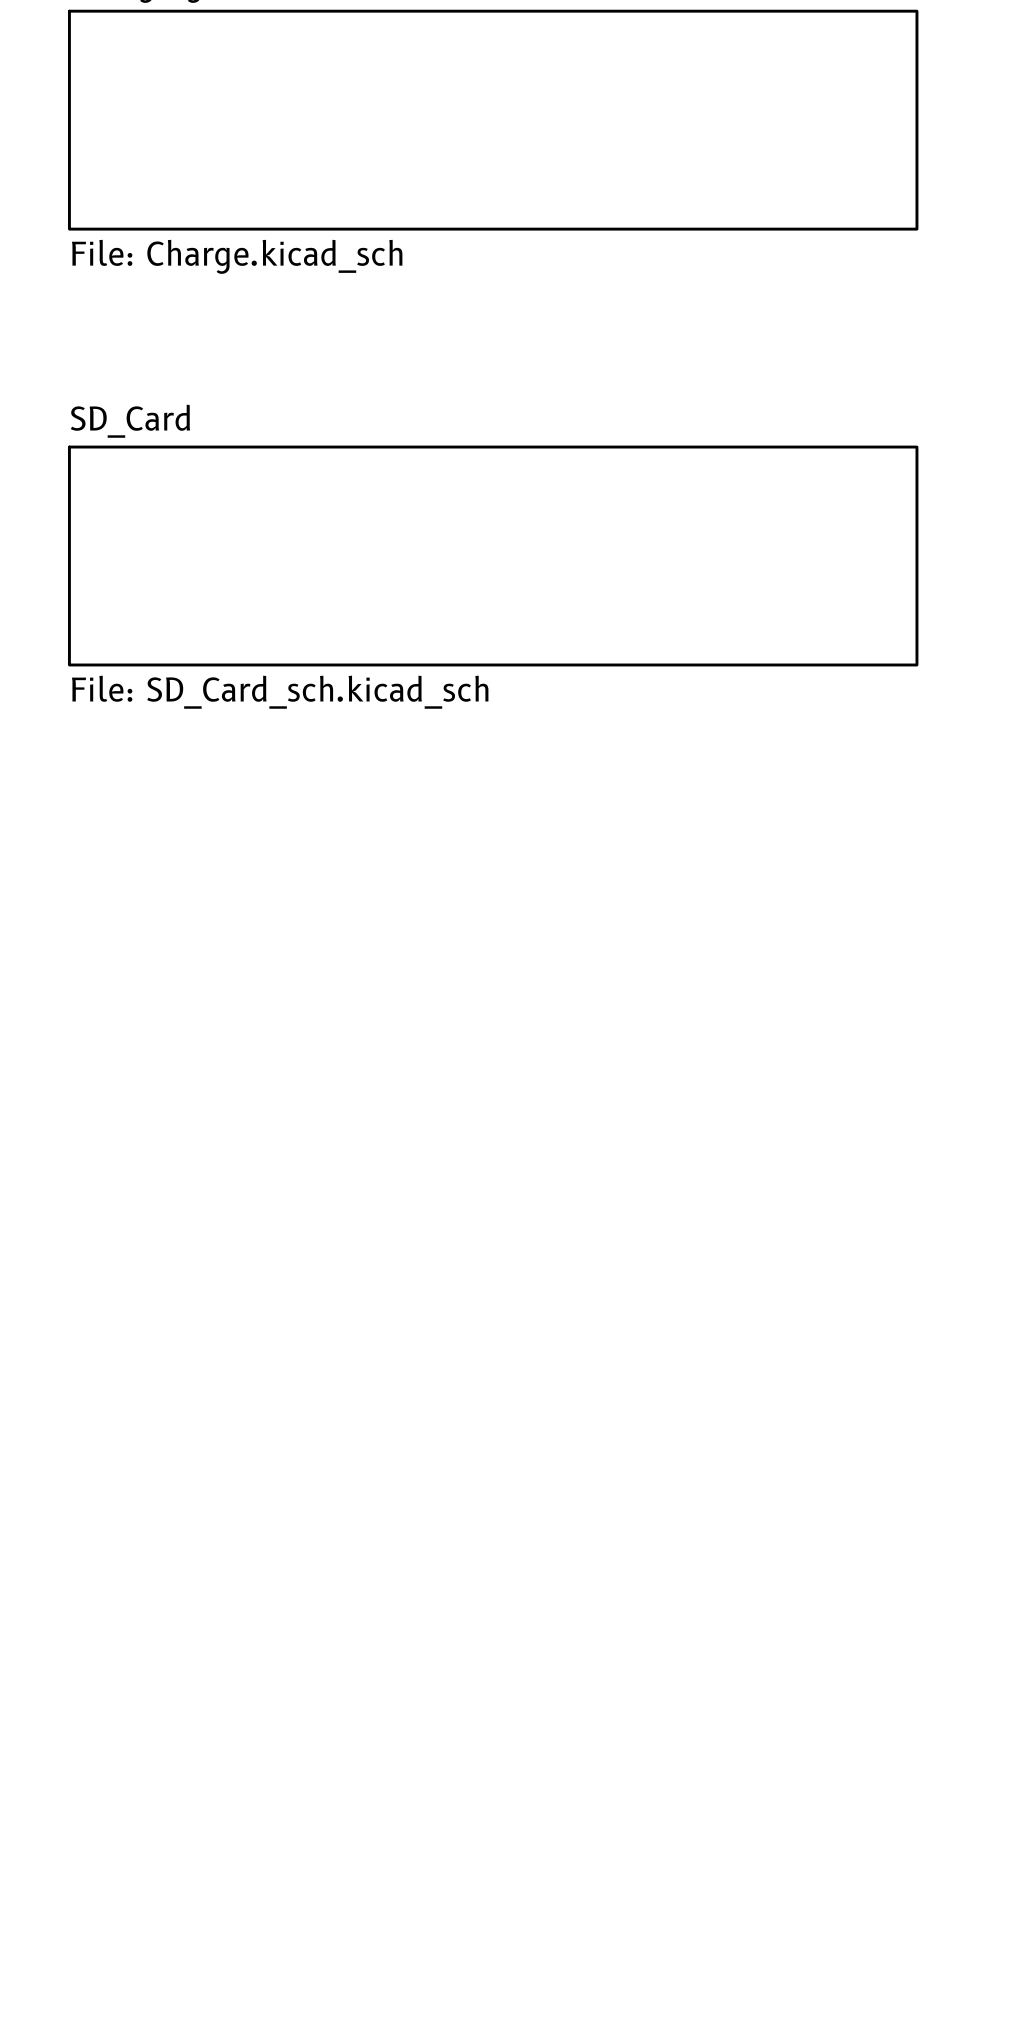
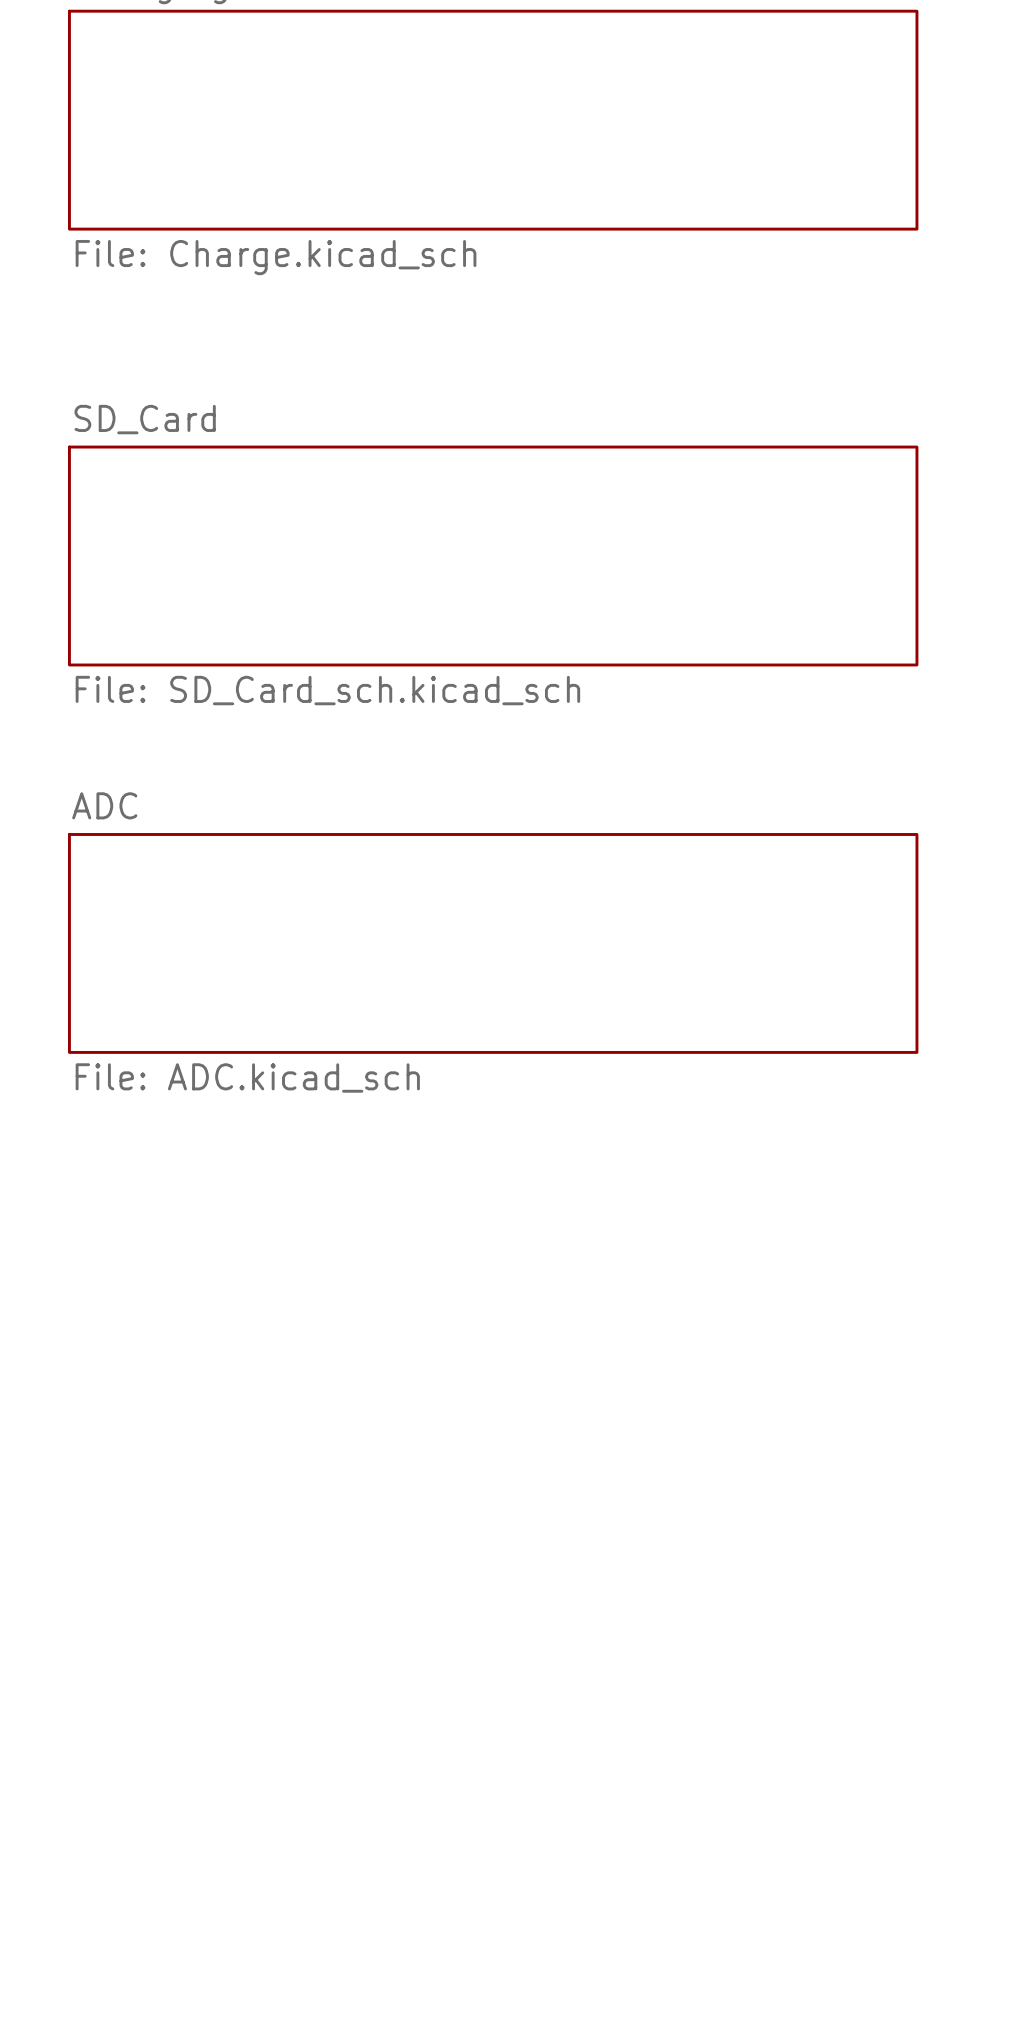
sheet ADC: none -> File: ADC.kicad_sch (493, 943)

